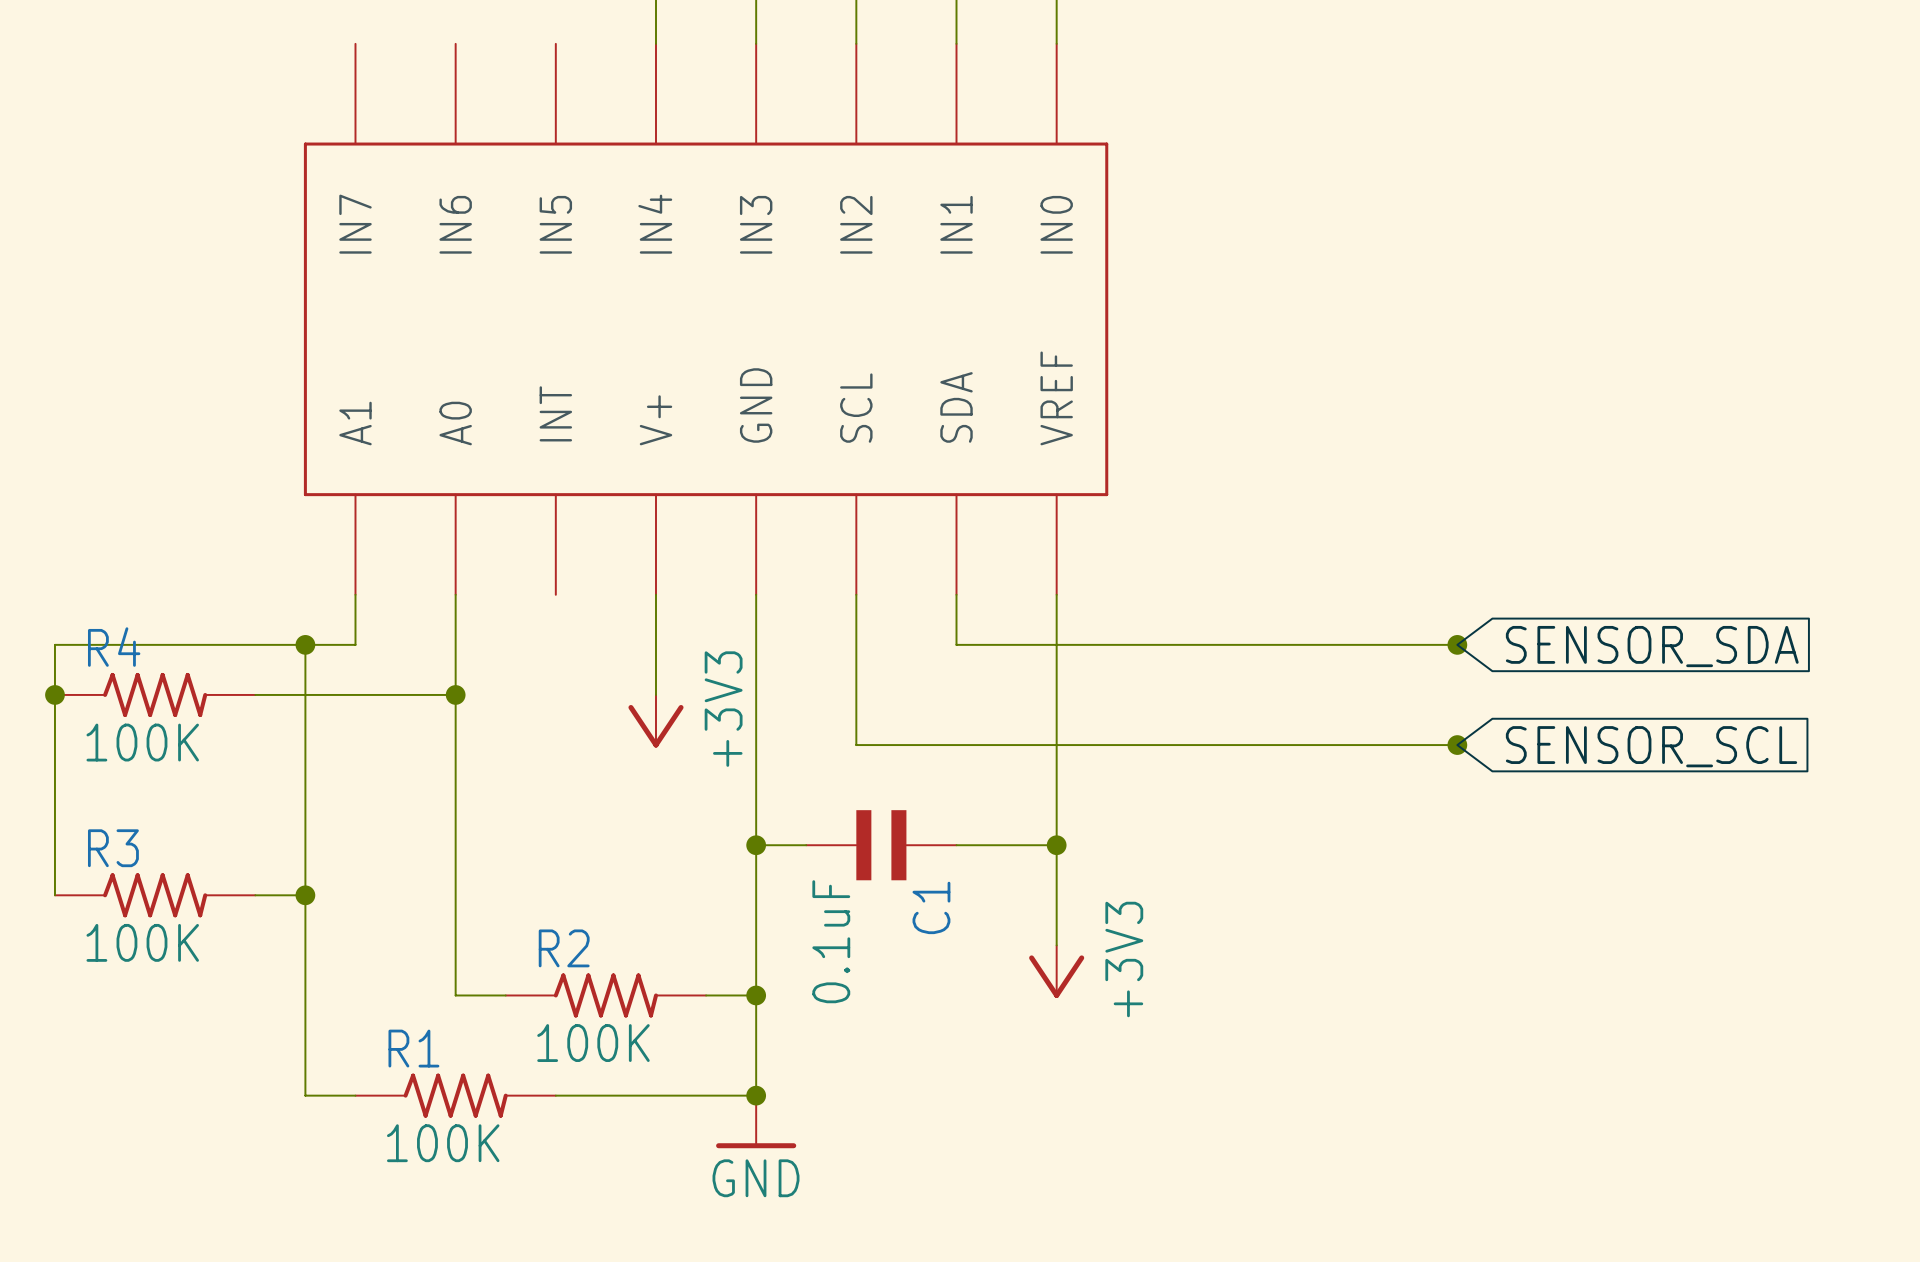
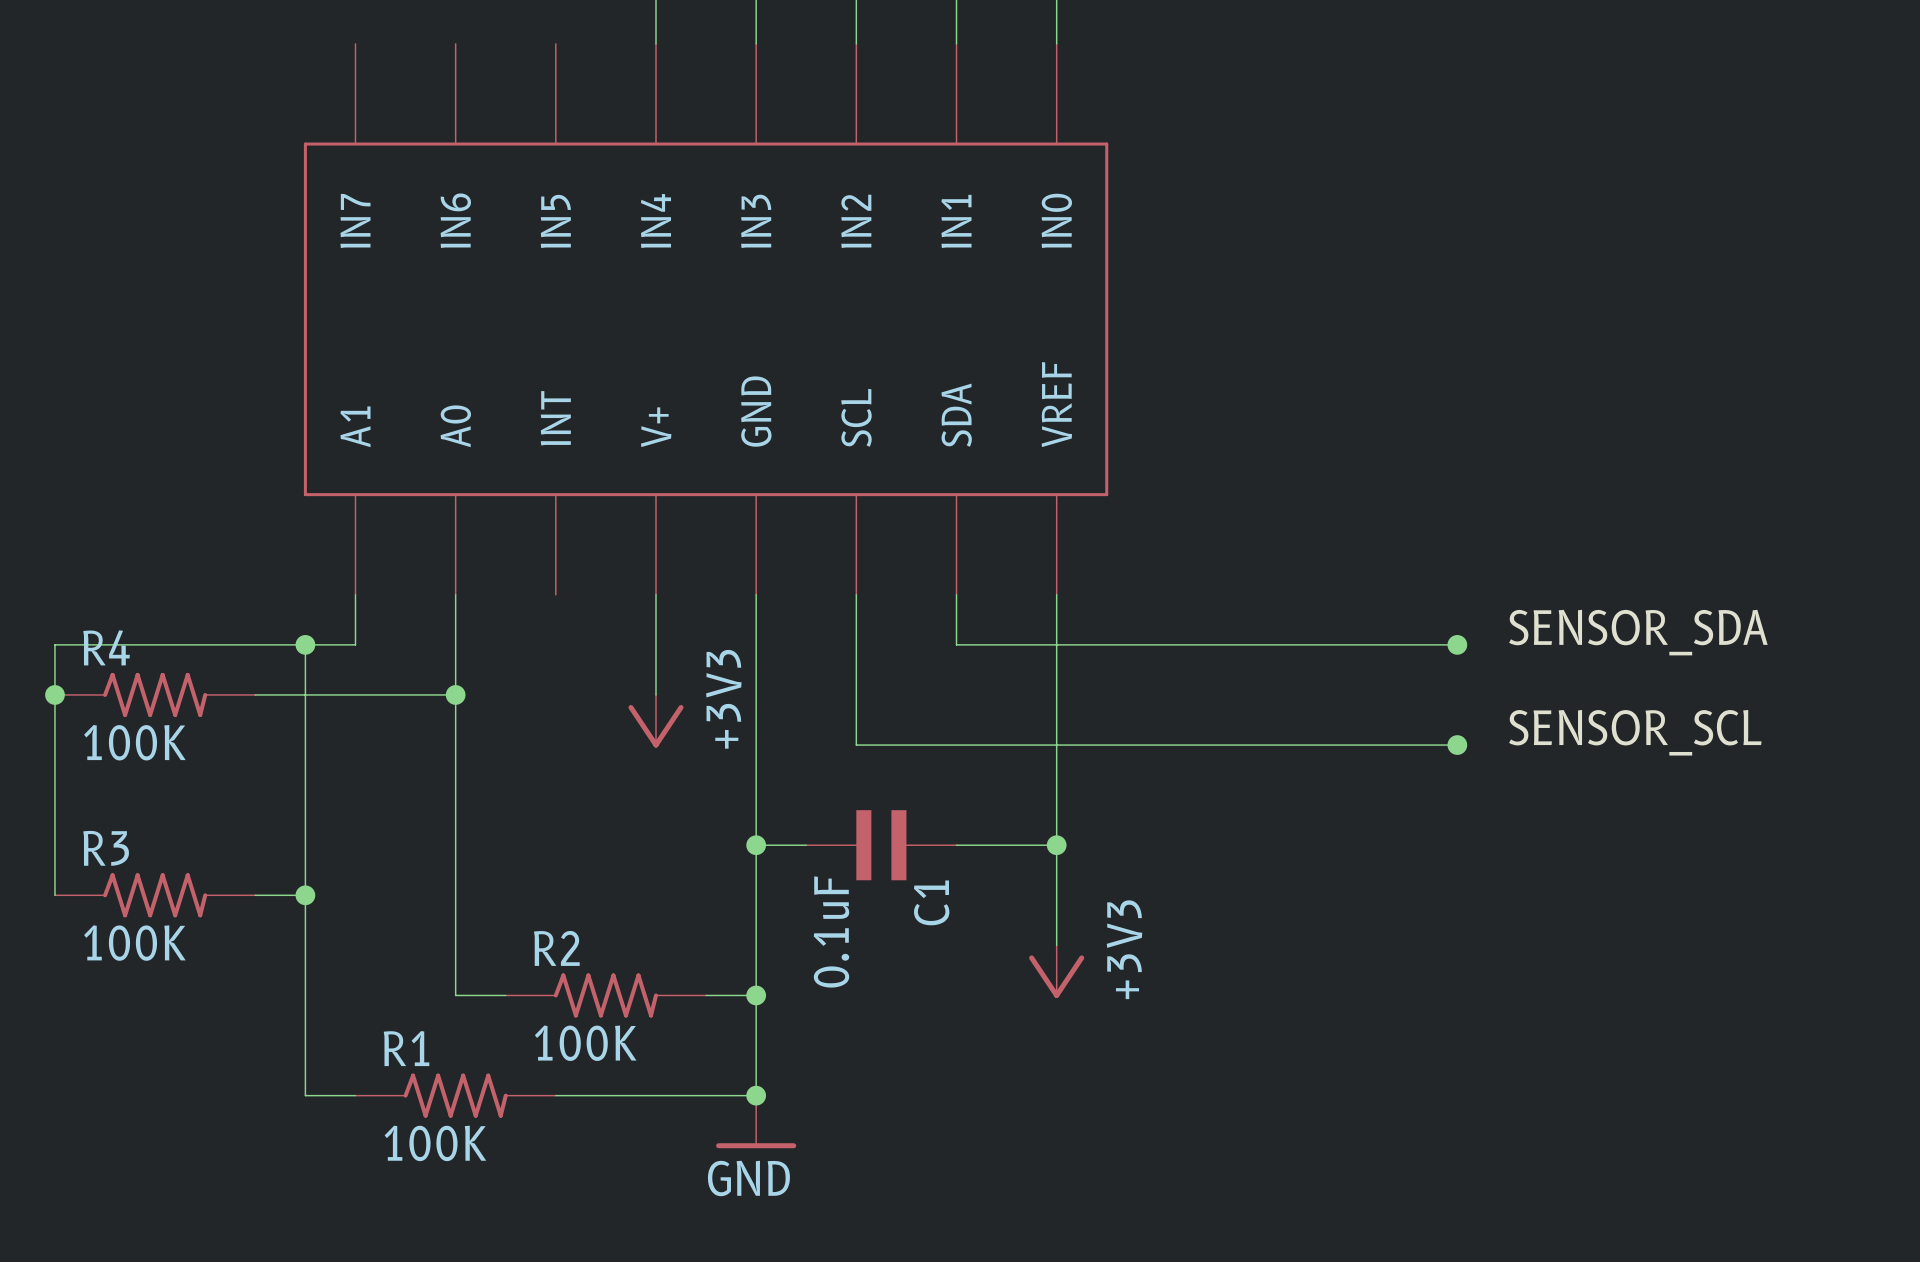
label: none -> SENSOR_SDA (1638, 632)
global label: SENSOR_SDA (1652, 646) -> none
label: none -> SENSOR_SCL (1635, 732)
global label: SENSOR_SCL (1651, 746) -> none

